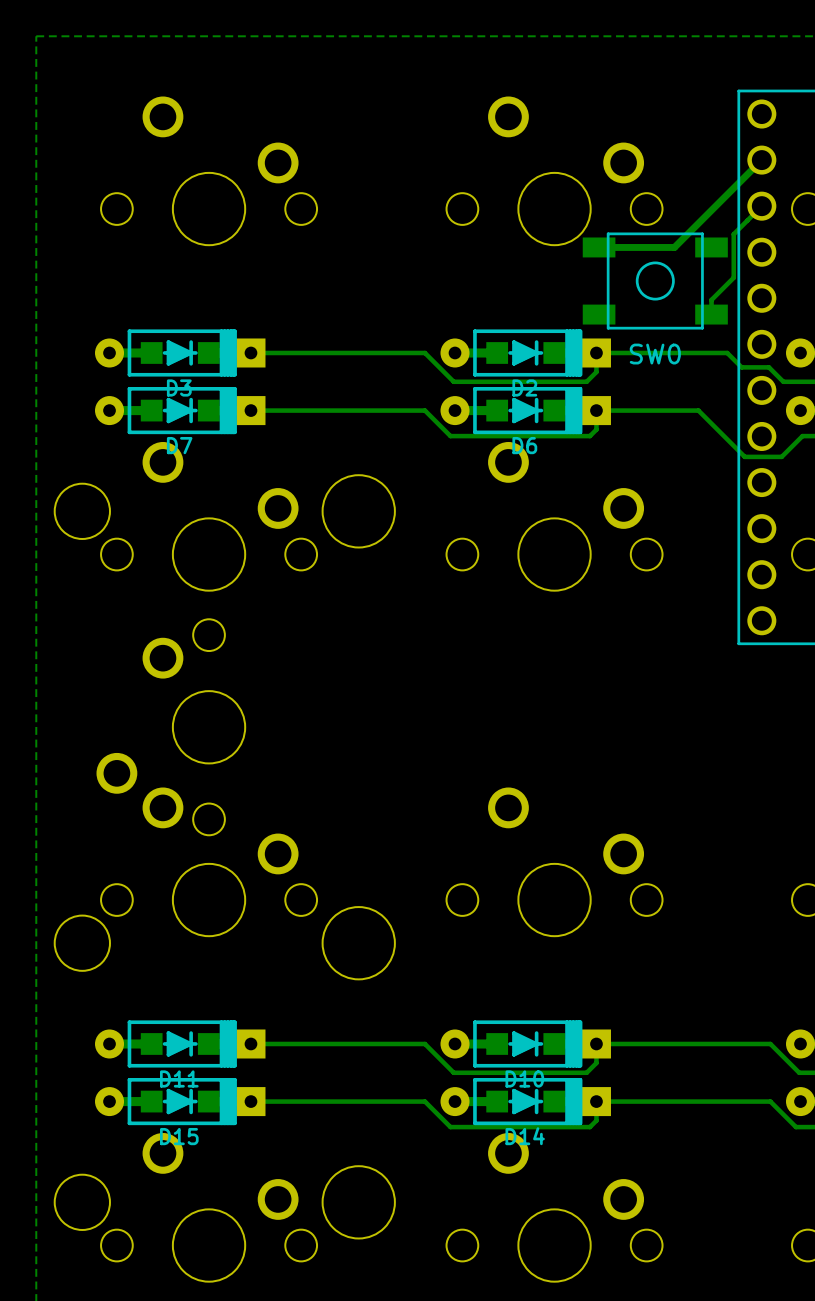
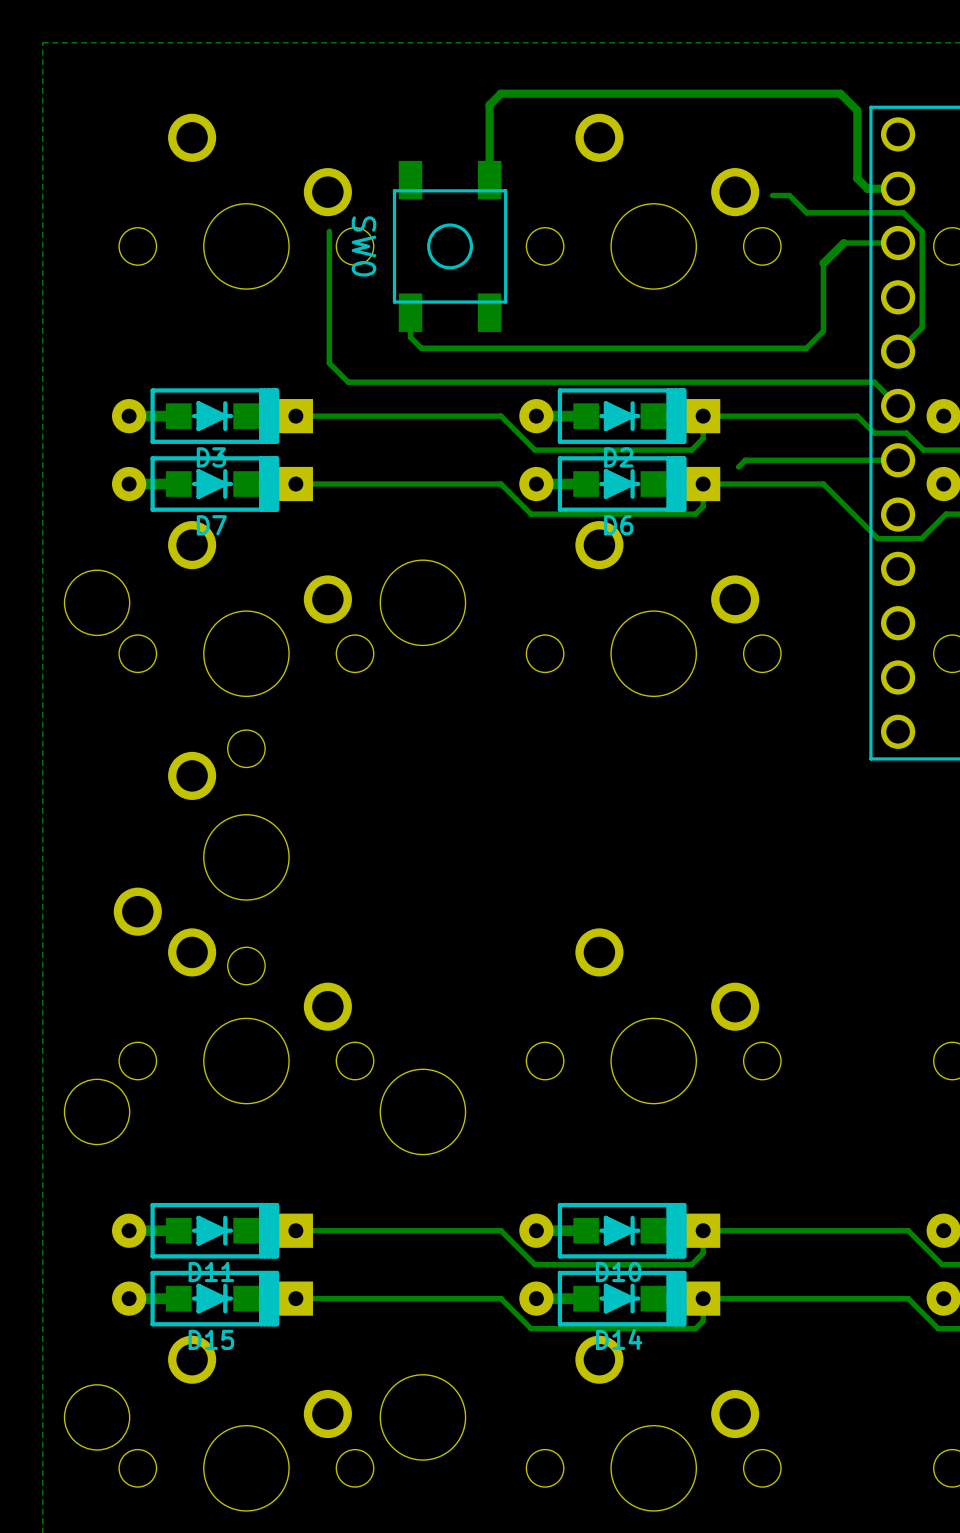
track: none -> (489, 180) (489, 105) (500, 93) (840, 93) (857, 110) (857, 178) (867, 188) (898, 188)
track: (761, 160) (715, 206) -> (898, 243) (843, 243)
track: none -> (772, 195) (789, 195) (806, 212) (903, 212) (922, 231) (922, 327) (898, 351)
track: none -> (329, 231) (329, 363) (348, 382) (874, 382) (898, 405)
track: (761, 206) (733, 234) (733, 277) (711, 299) (711, 314) -> none
track: (698, 223) (674, 247) (599, 247) -> (823, 263) (823, 331) (806, 348) (421, 348) (410, 337) (410, 312)
SW0 rotation: 0° (655, 281) -> 90° clockwise (450, 246)
SW0 position: (655, 281) -> (450, 246)
track: none -> (898, 460) (745, 460) (738, 467)

